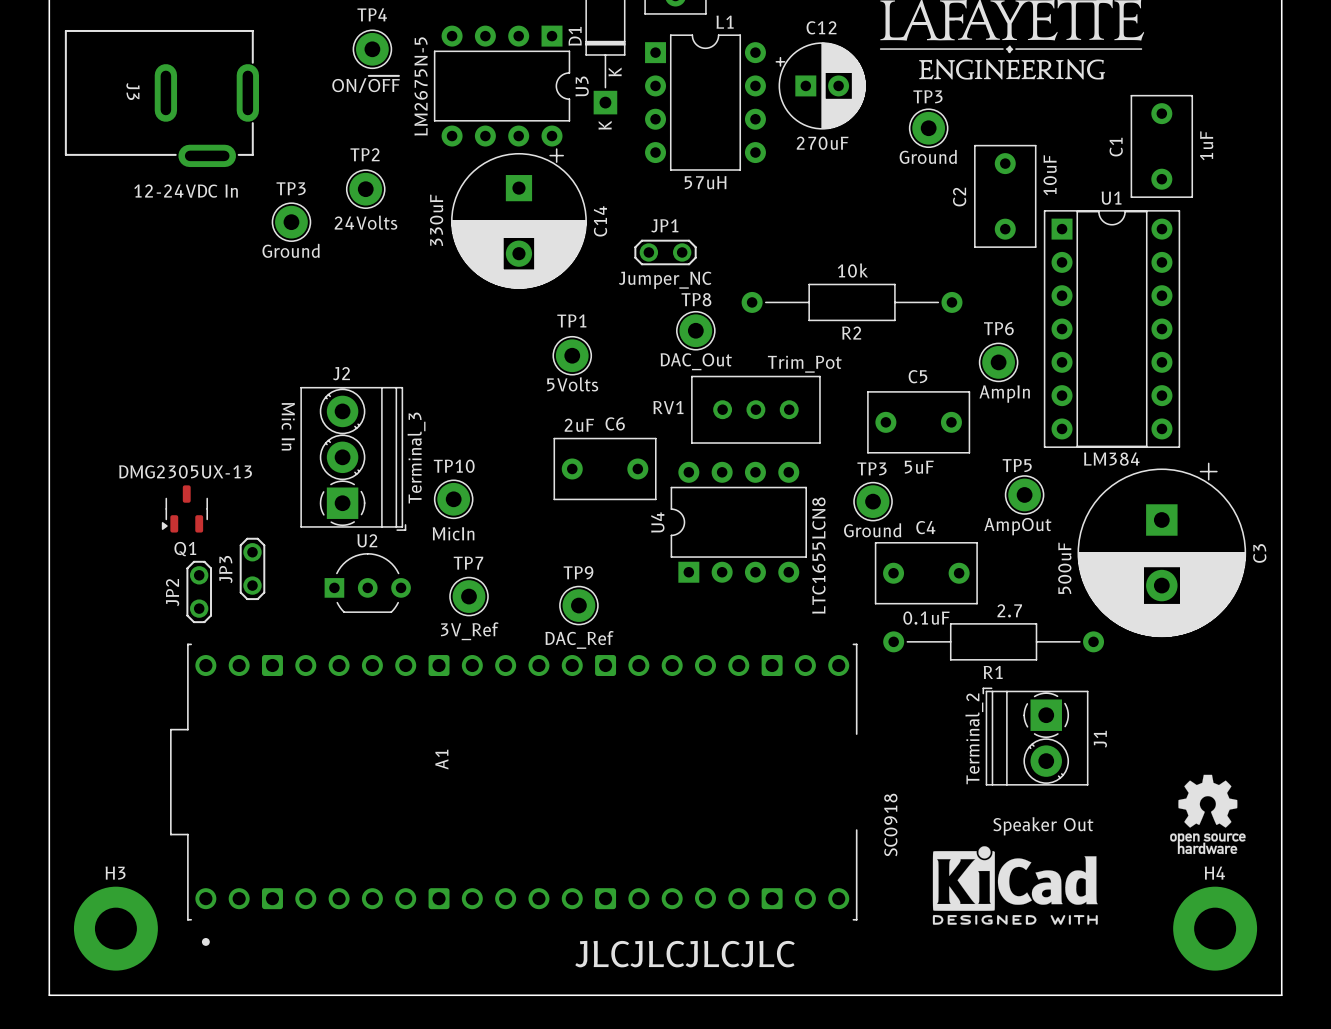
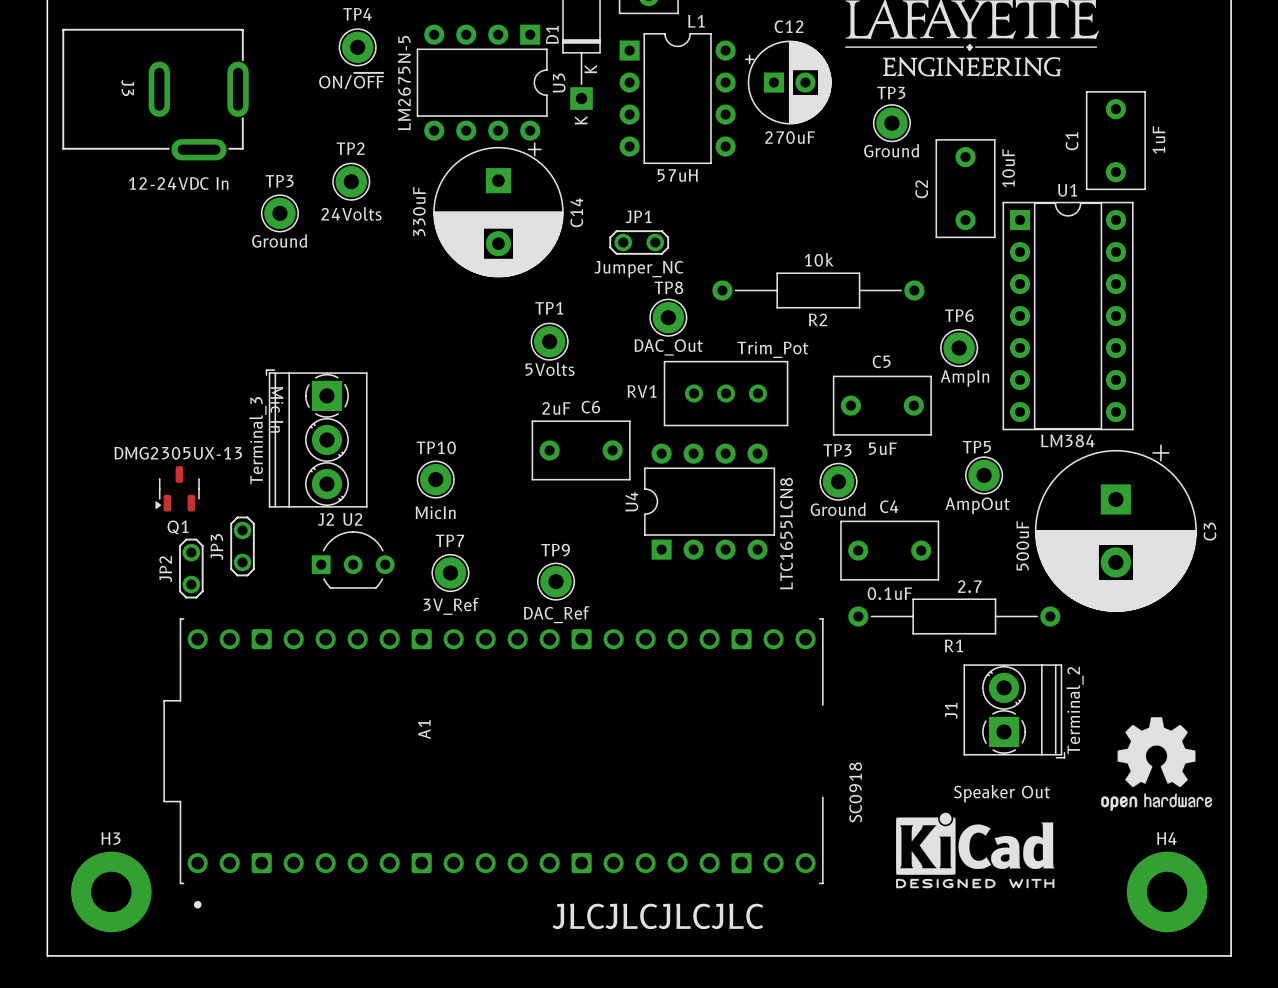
J2 rotation: 0° (353, 458) -> 180° (316, 438)
J1 rotation: 0° (1035, 736) -> 180° (1014, 711)
drawing: none -> [1101, 717, 1212, 812]
drawing: [1170, 774, 1246, 855] -> none

